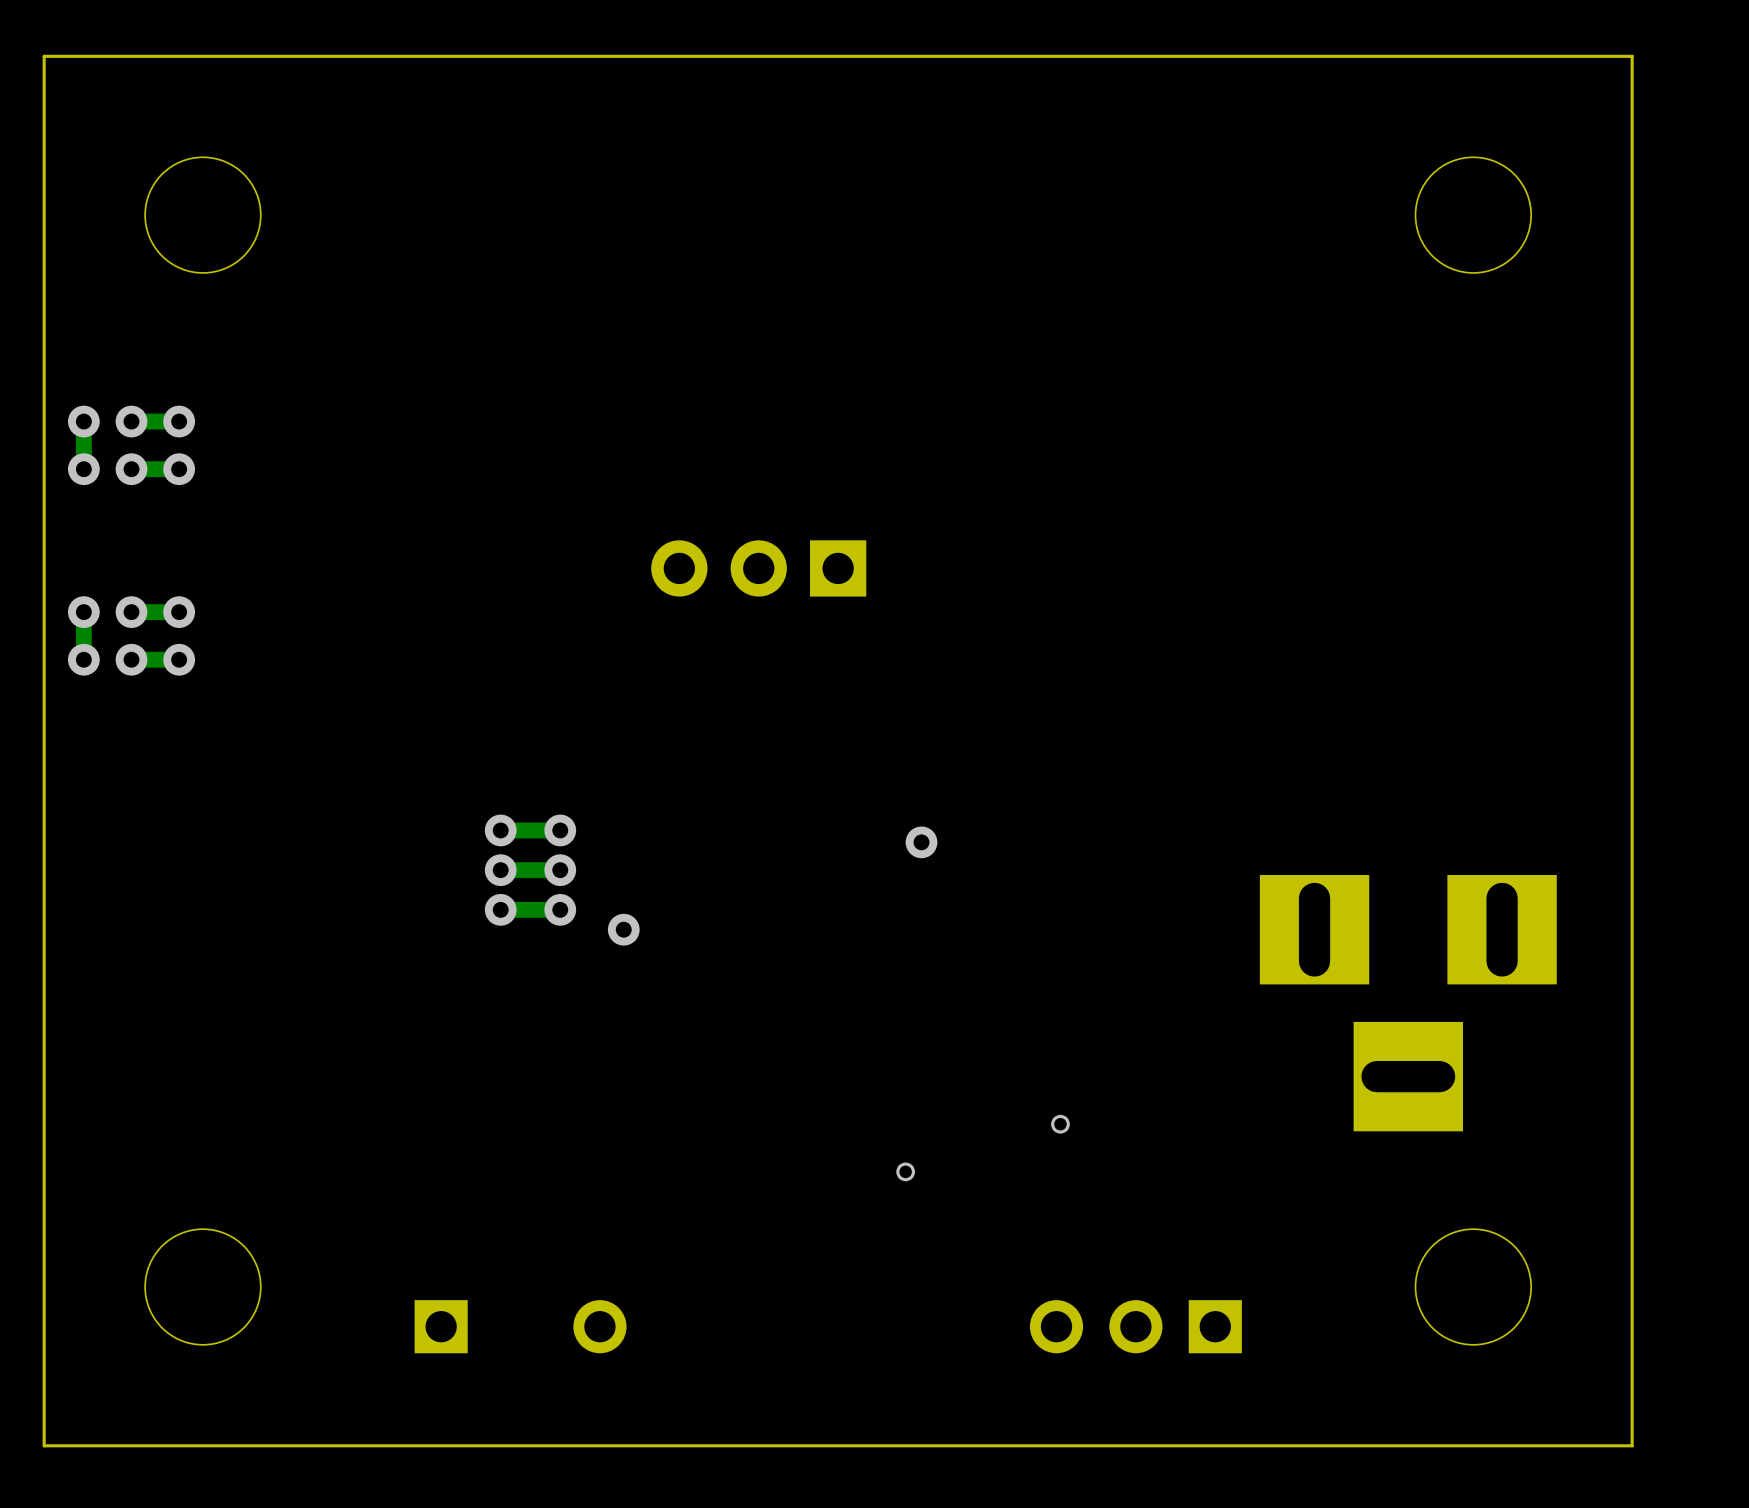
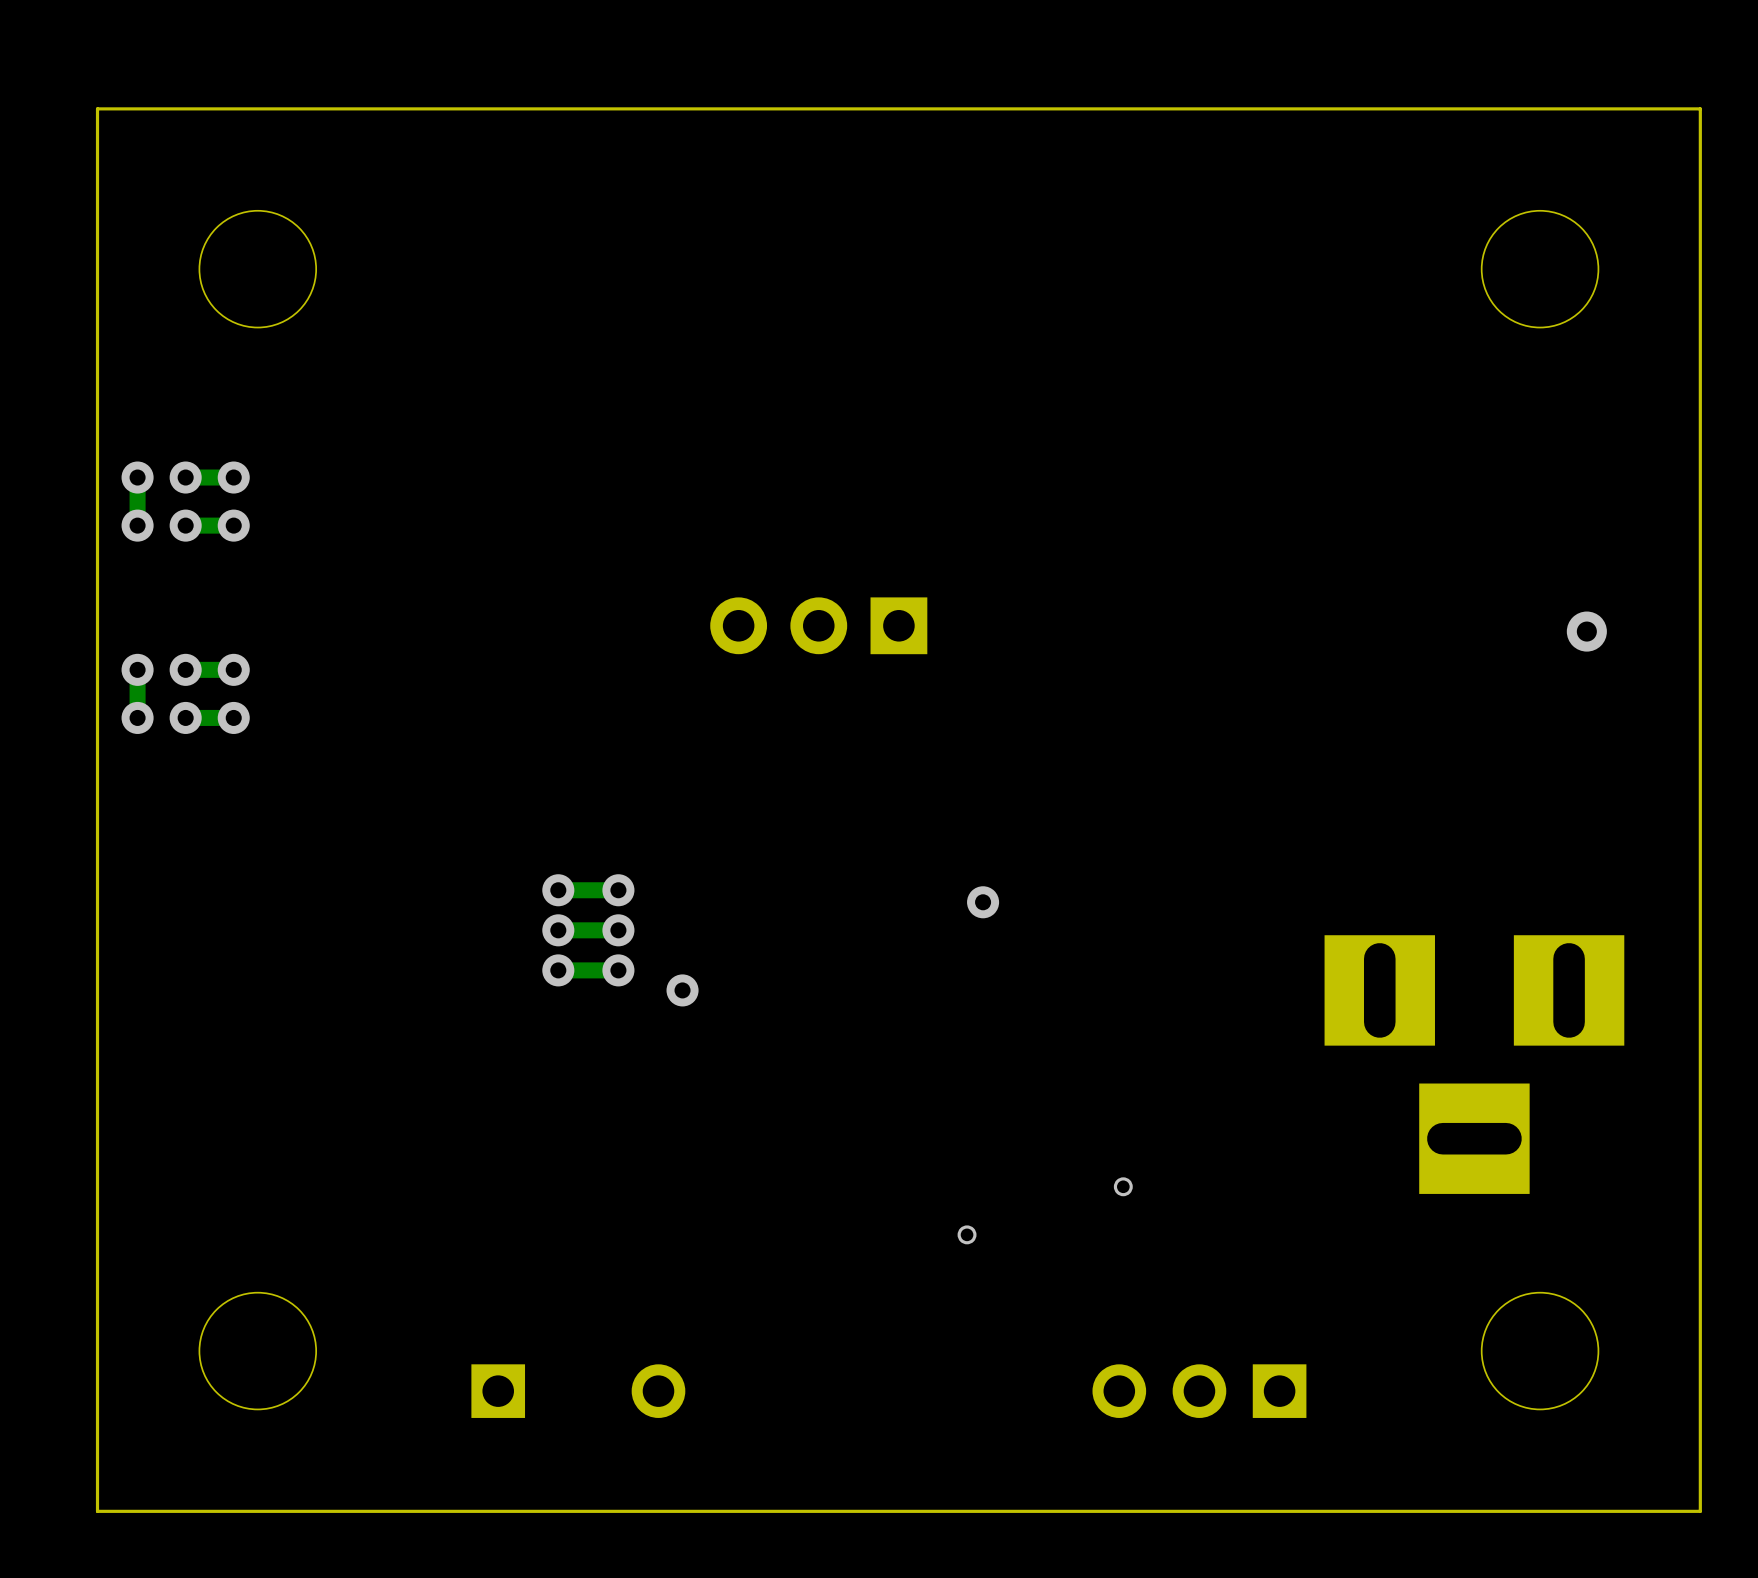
via: none -> (1586, 631)

